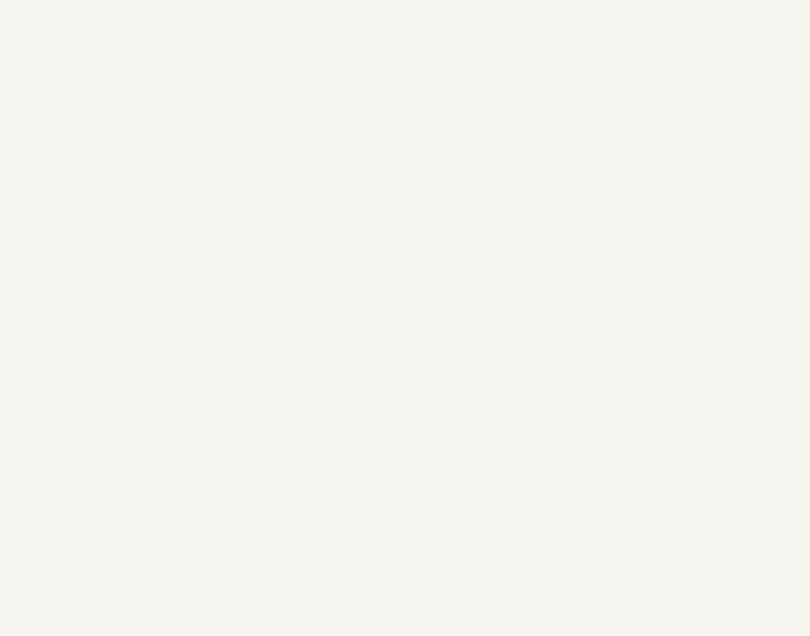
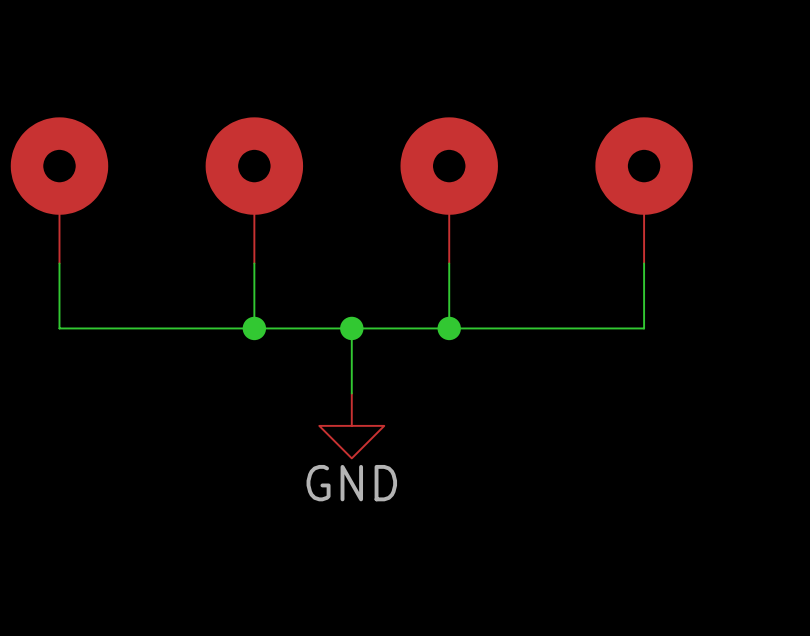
part: none -> (59, 190)
part: none -> (254, 190)
part: none -> (449, 190)
part: none -> (644, 190)
wire: none -> (59, 263) (59, 328) (644, 328) (644, 263)
wire: none -> (254, 263) (254, 328)
wire: none -> (449, 263) (449, 328)
junction: none -> (254, 328)
wire: none -> (351, 328) (351, 393)
junction: none -> (351, 328)
junction: none -> (449, 328)
power symbol: none -> GND (351, 425)

